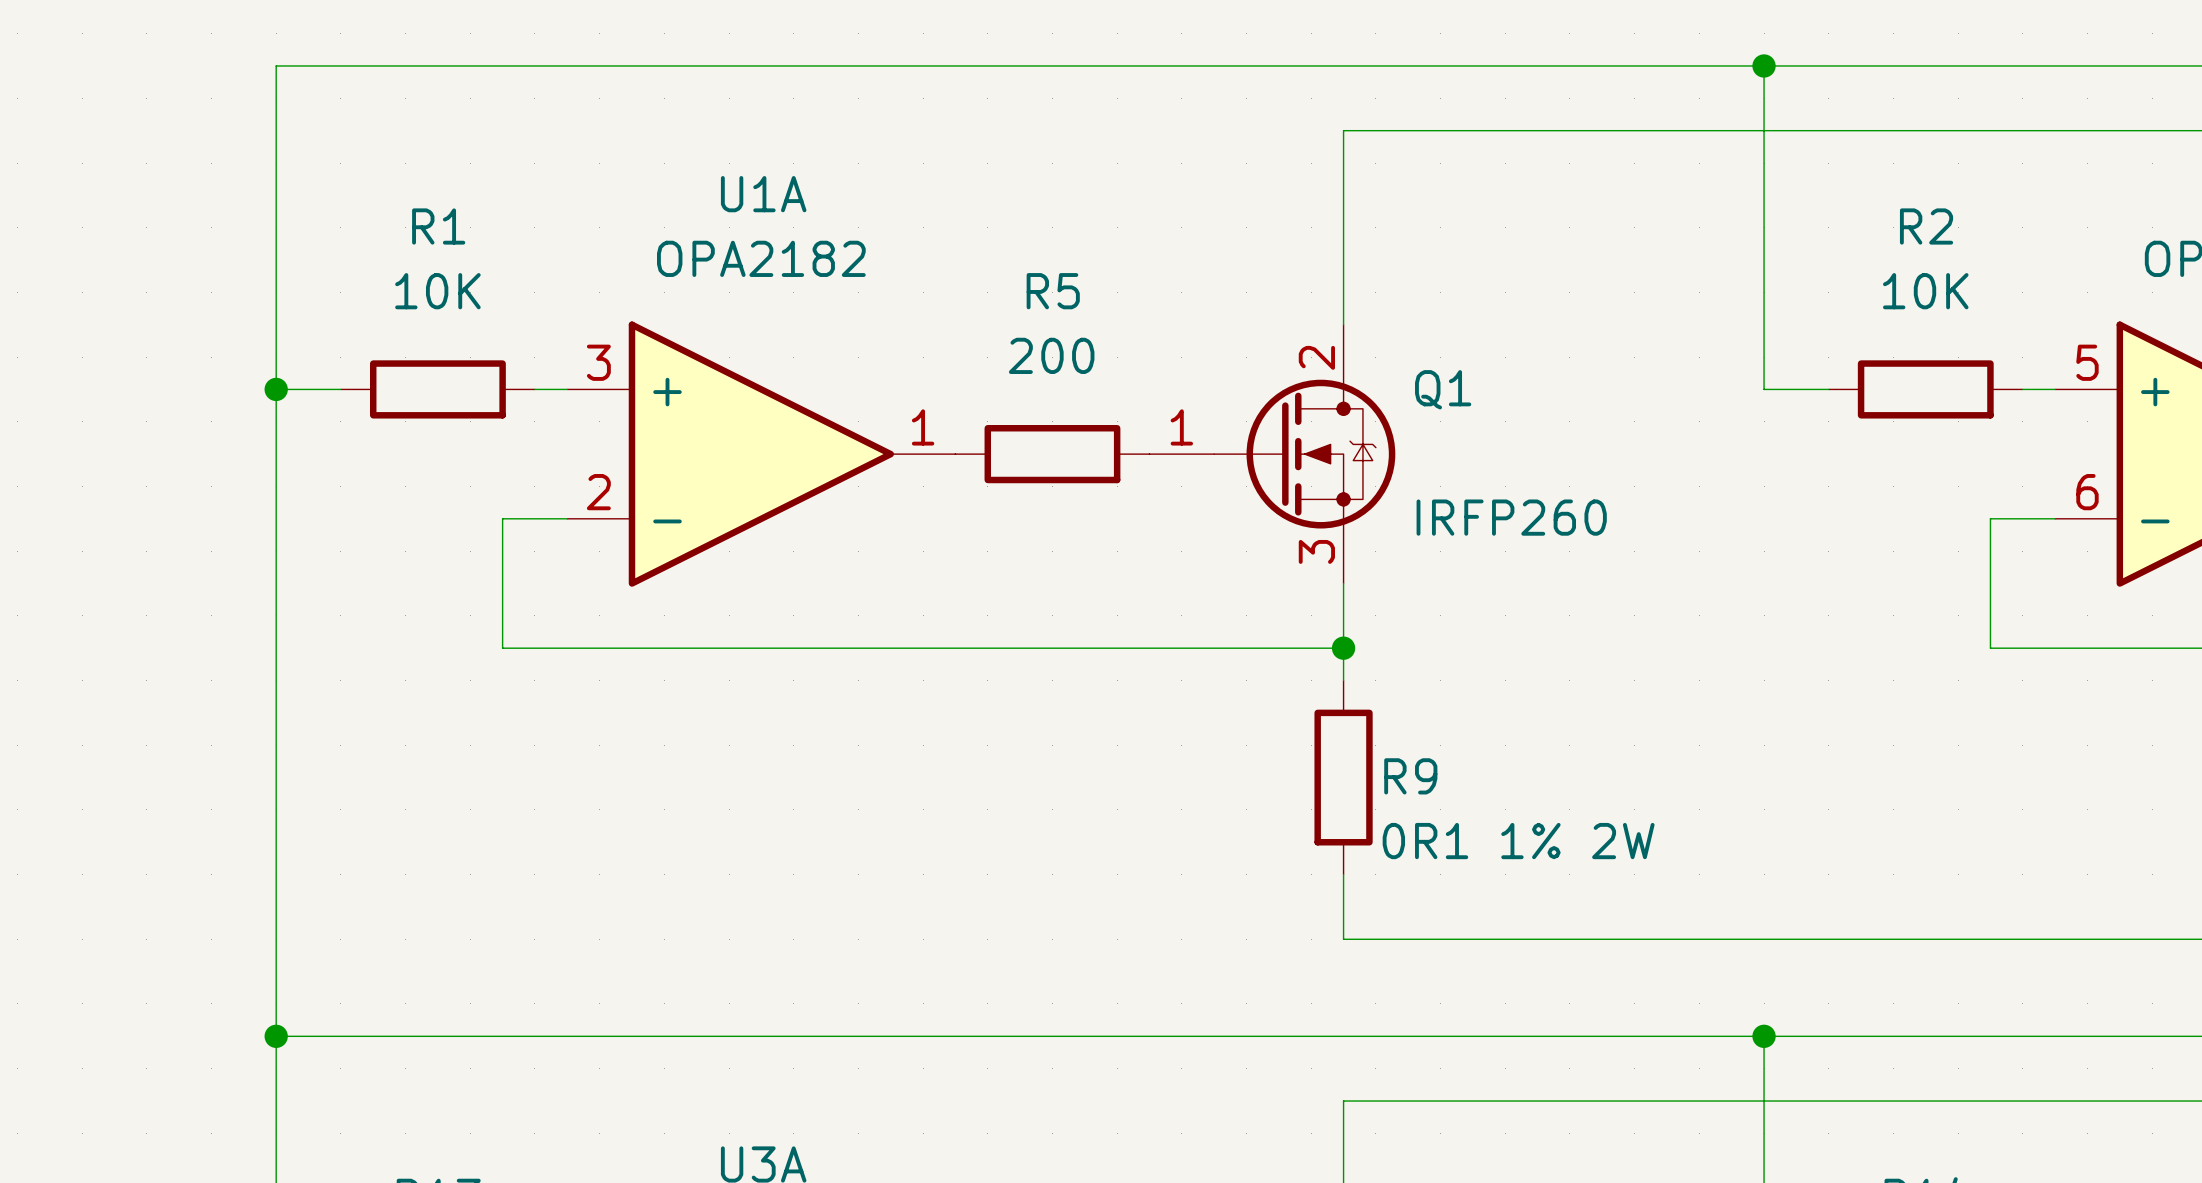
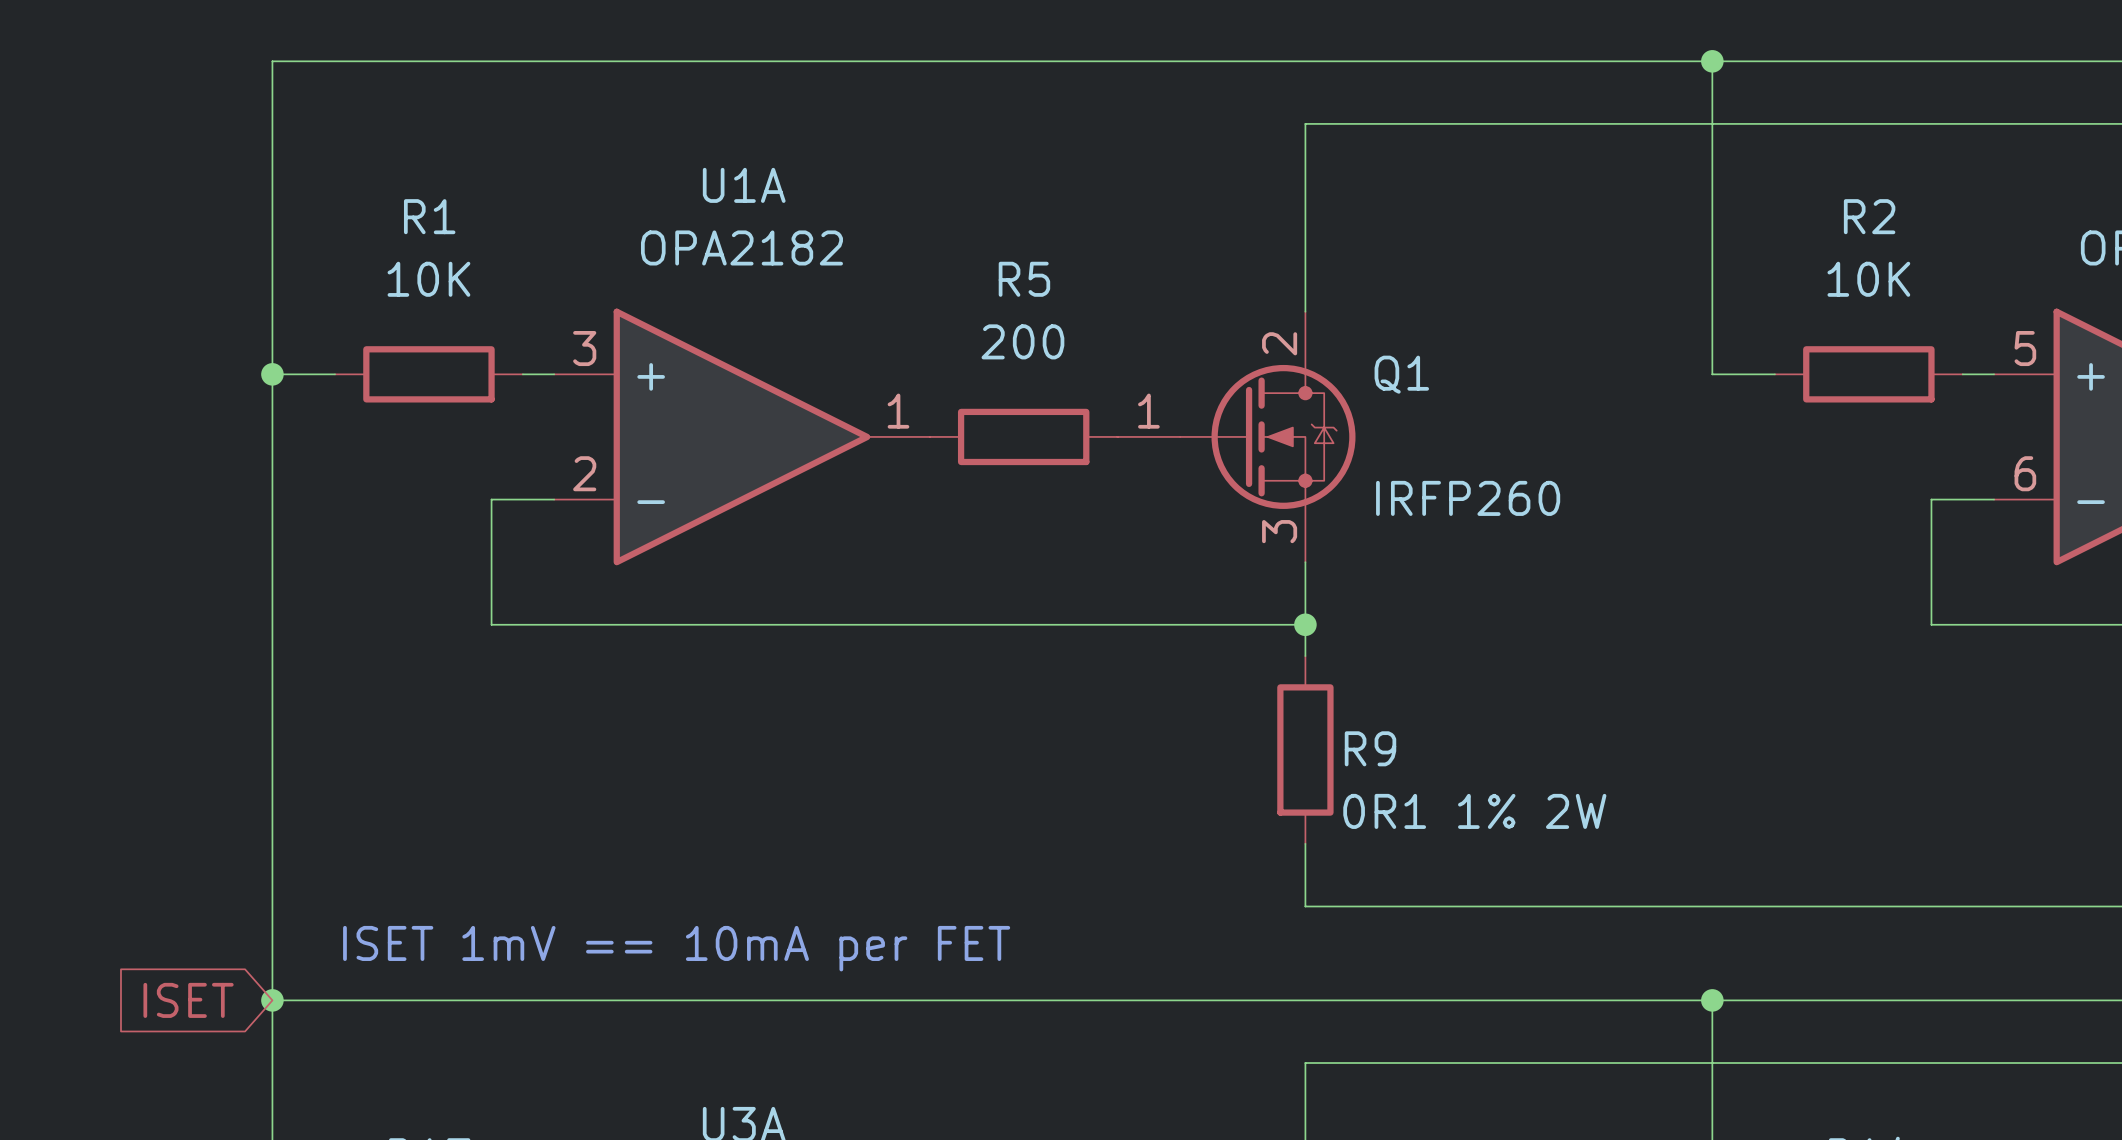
text: none -> ISET 1mV == 10mA per FET (676, 948)
global label: none -> ISET (188, 1000)

